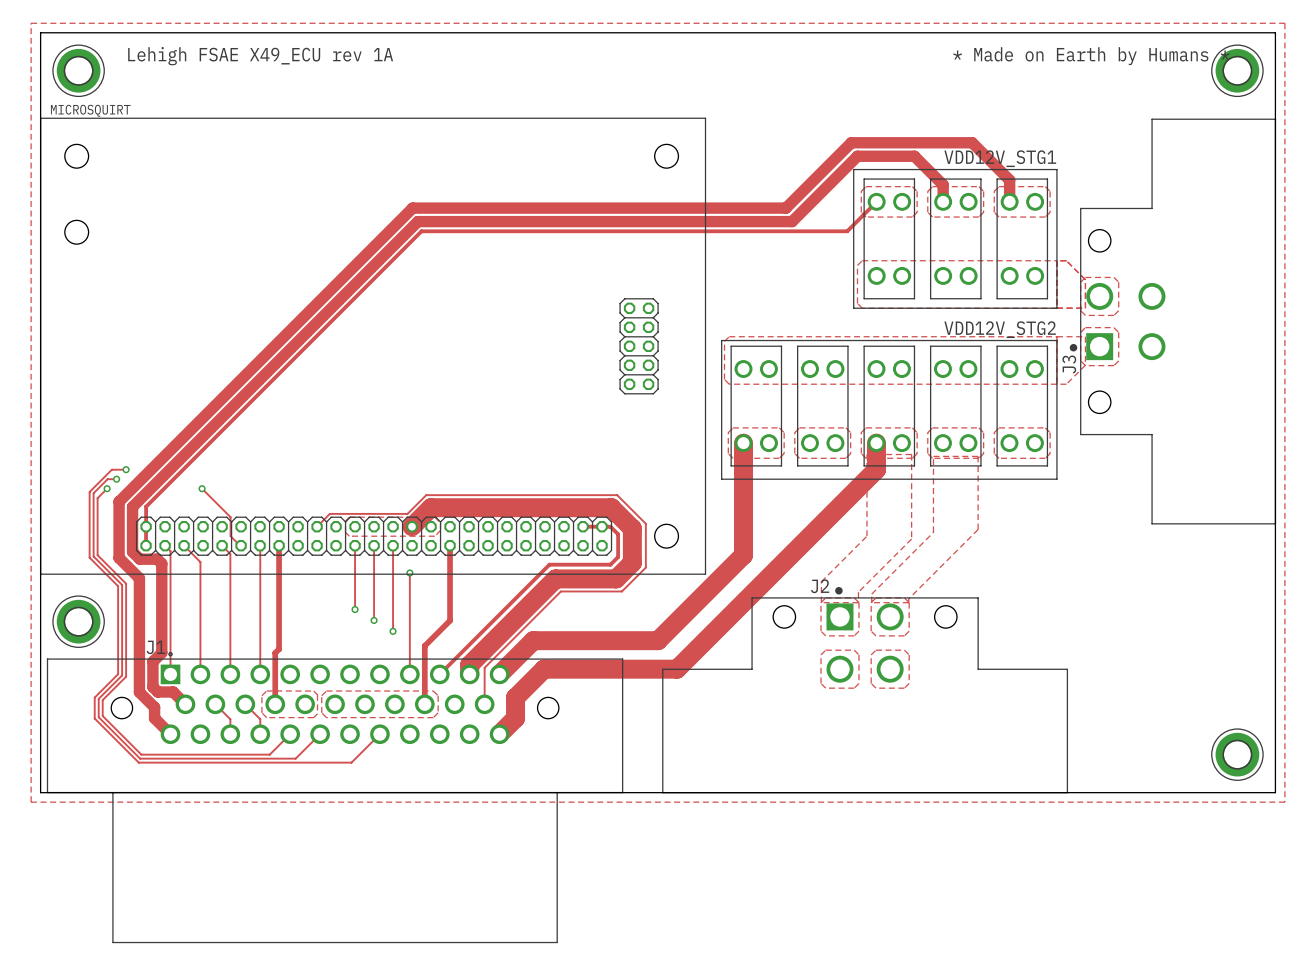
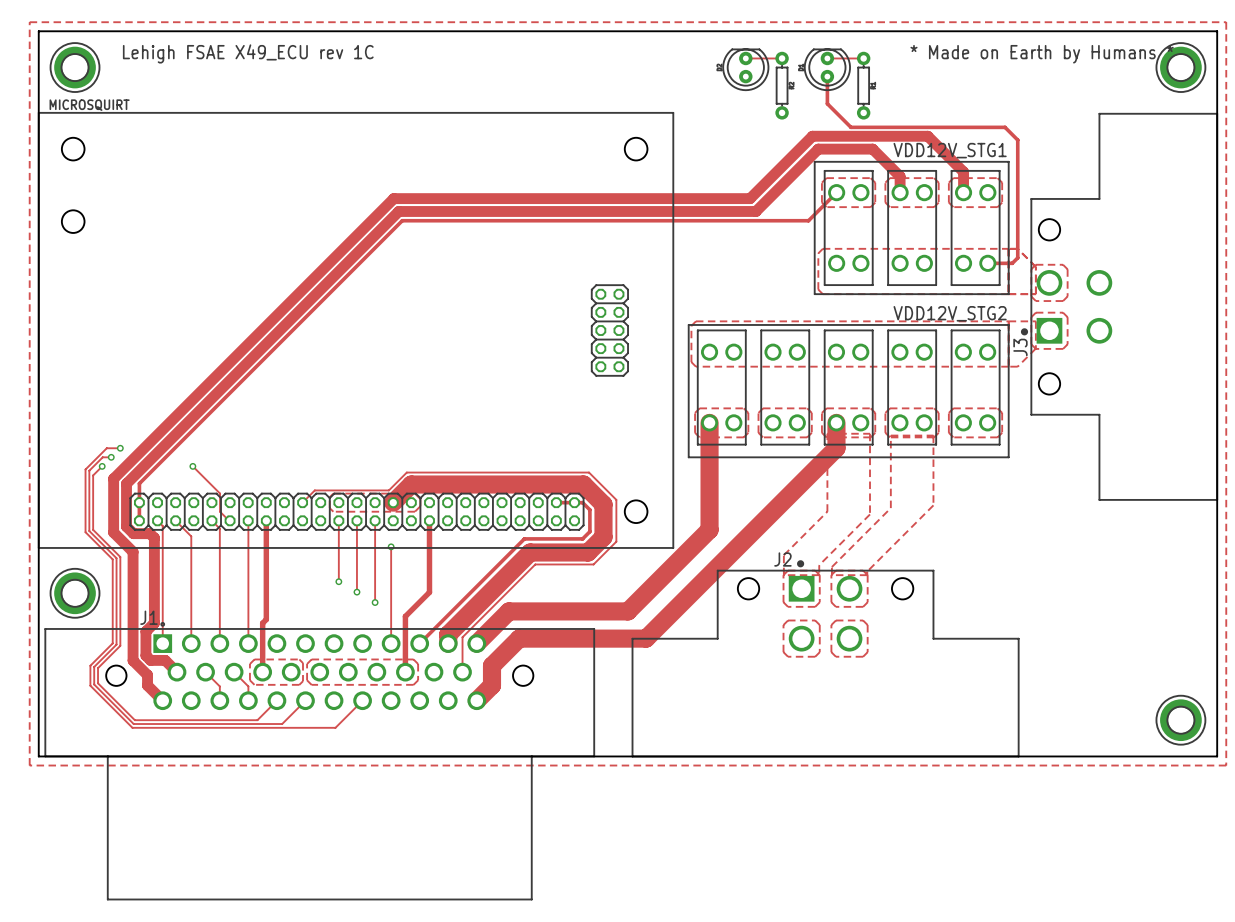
text: Lehigh FSAE X49_ECU rev 1A (260, 56) -> Lehigh FSAE X49_ECU rev 1C (248, 53)
track: none -> (745, 58) (782, 58)
track: none -> (827, 58) (863, 58)
part: none -> (745, 69)
part: none -> (827, 69)
track: none -> (827, 76) (827, 103) (850, 127) (1005, 127) (1017, 140) (1017, 257) (1012, 263) (987, 263)
part: none -> (782, 85)
part: none -> (863, 85)

